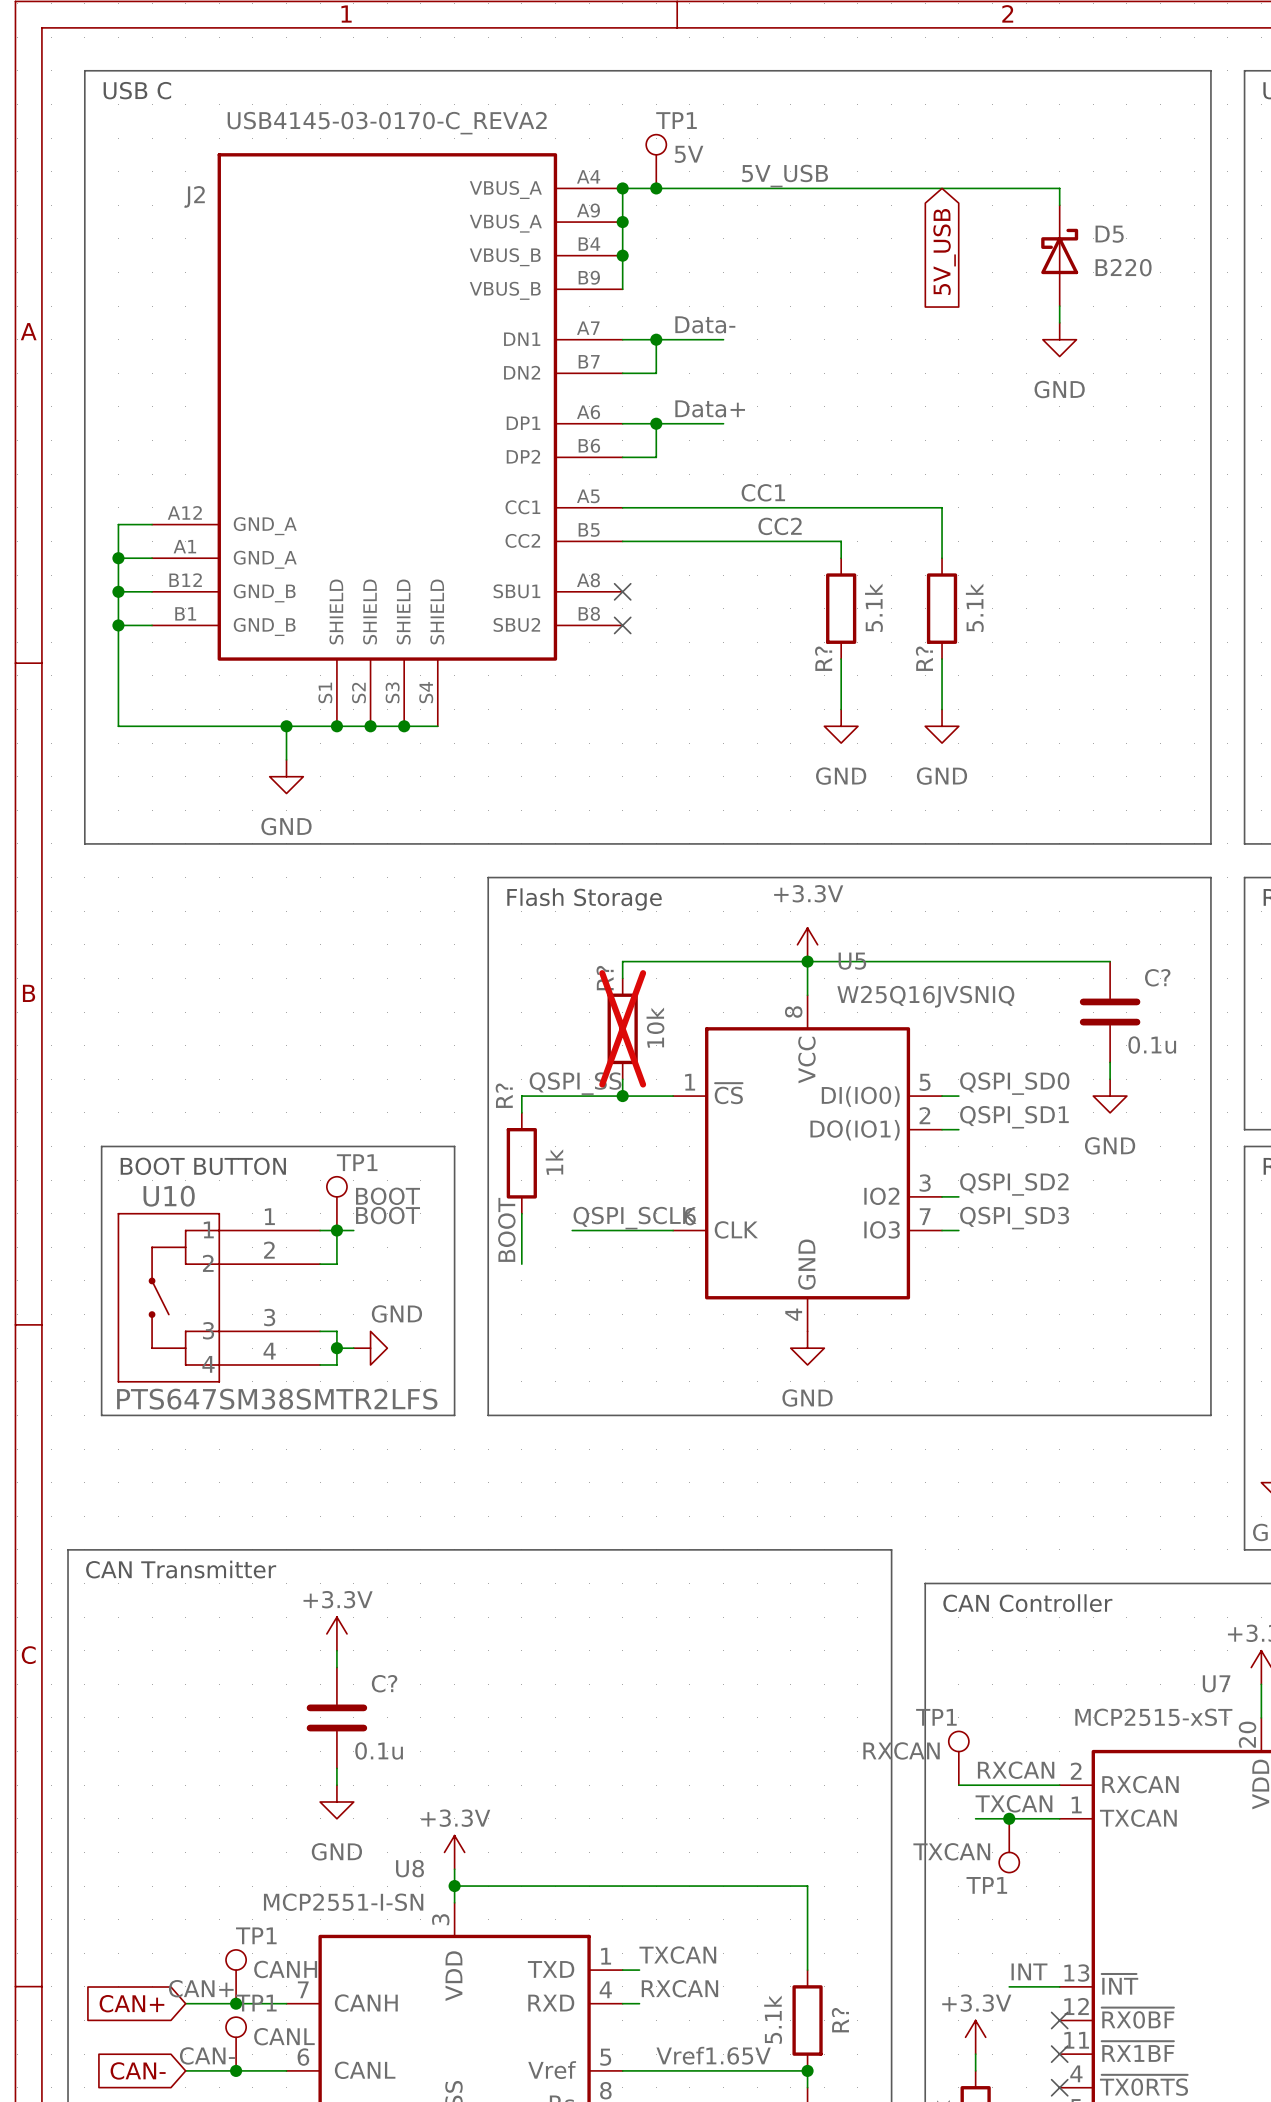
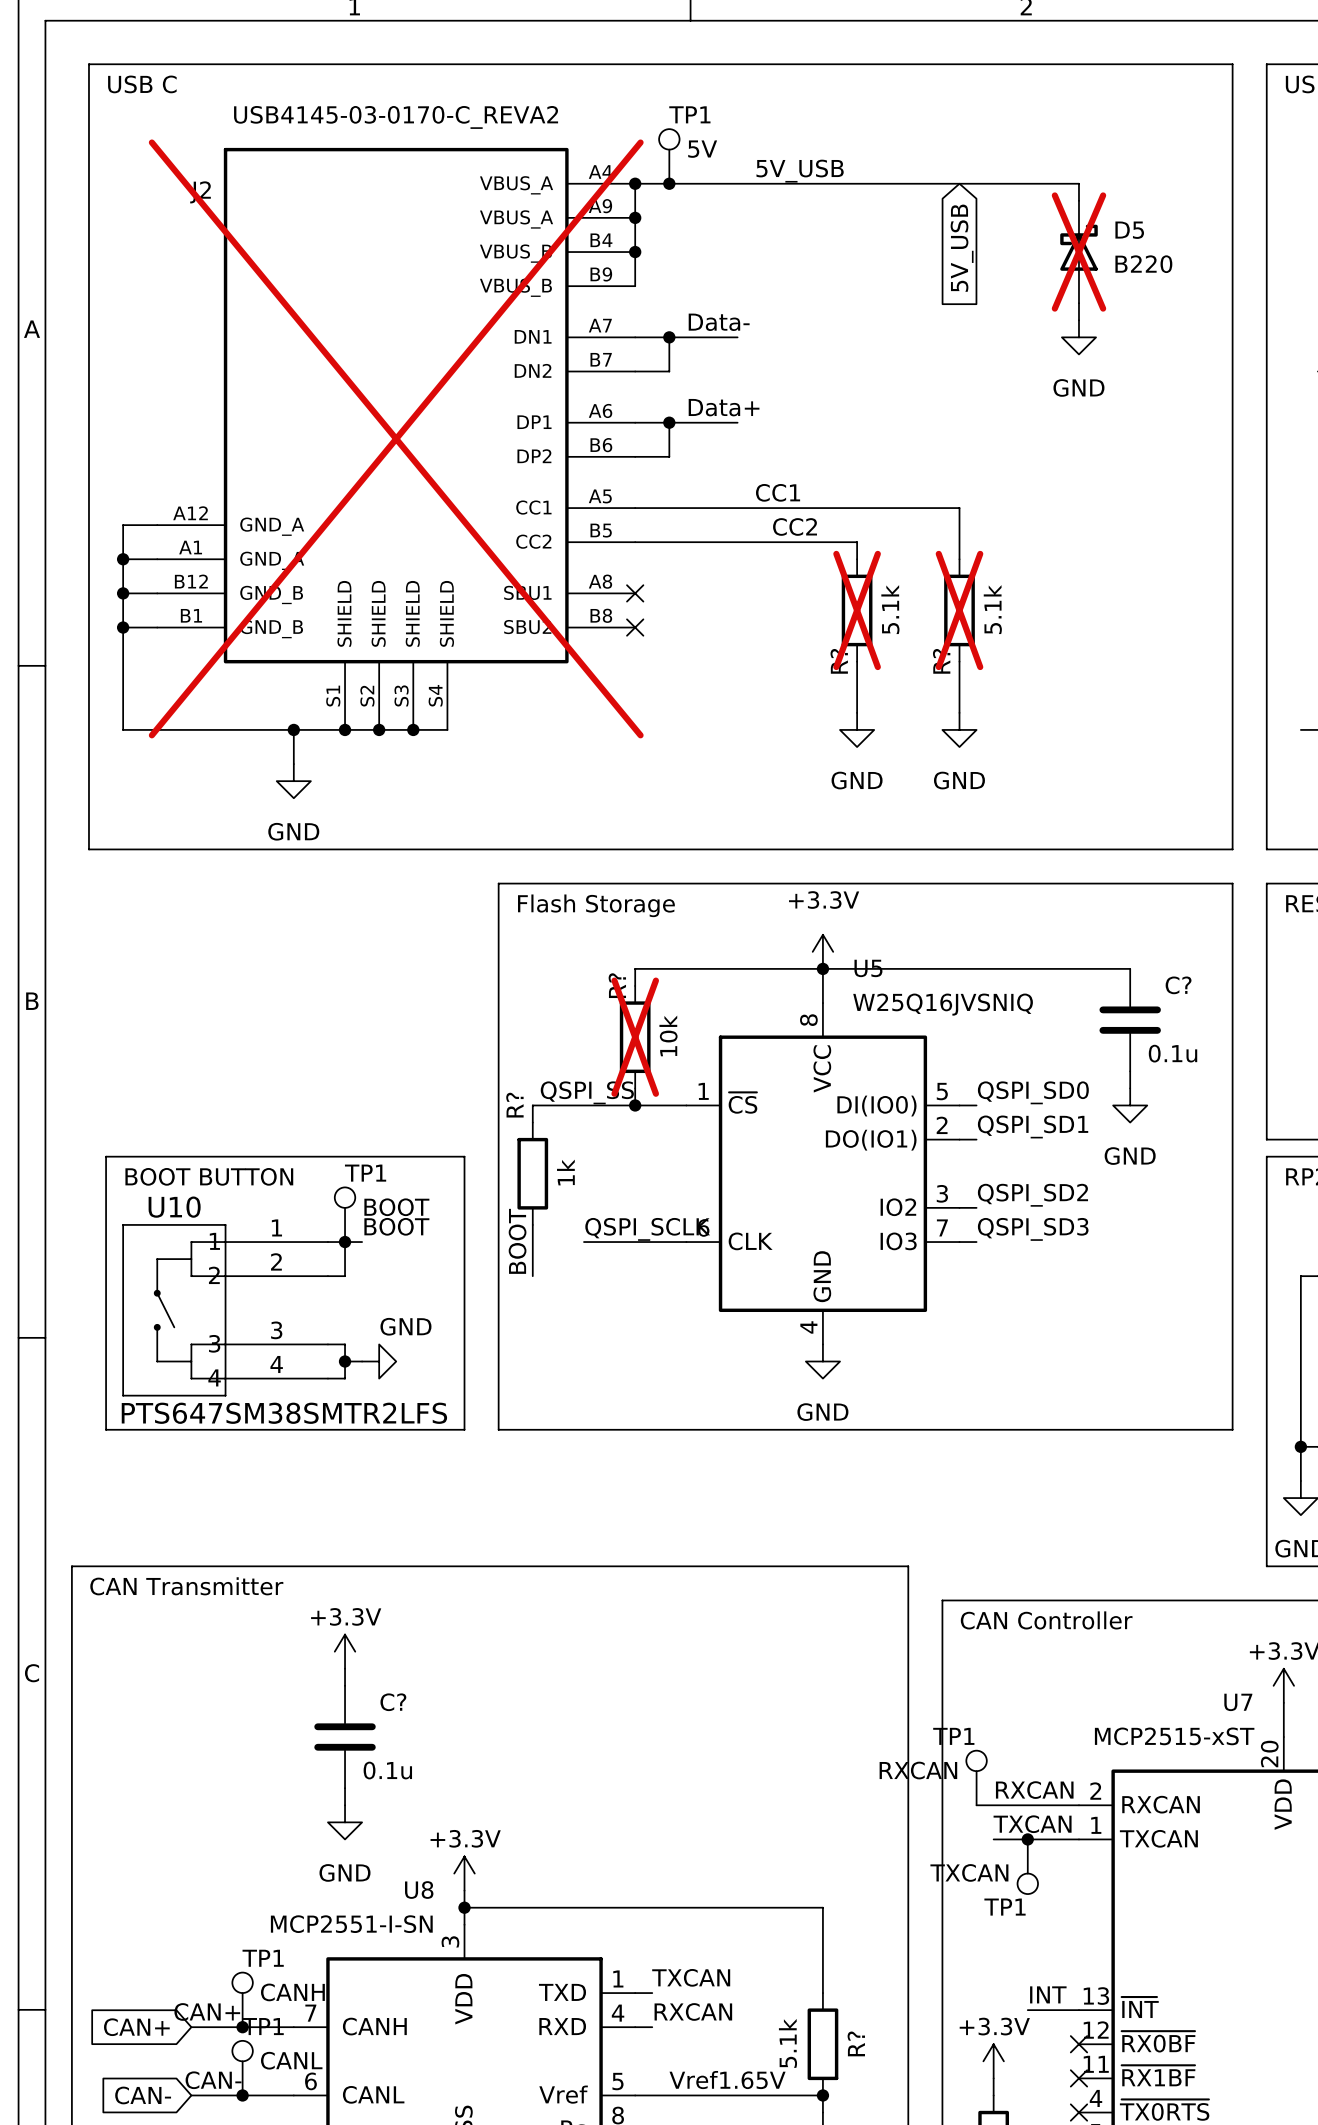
D5 do-not-place cross: none -> (1078, 252)
J2 do-not-place cross: none -> (396, 438)
R? do-not-place cross: none -> (857, 610)
R? do-not-place cross: none -> (959, 610)

